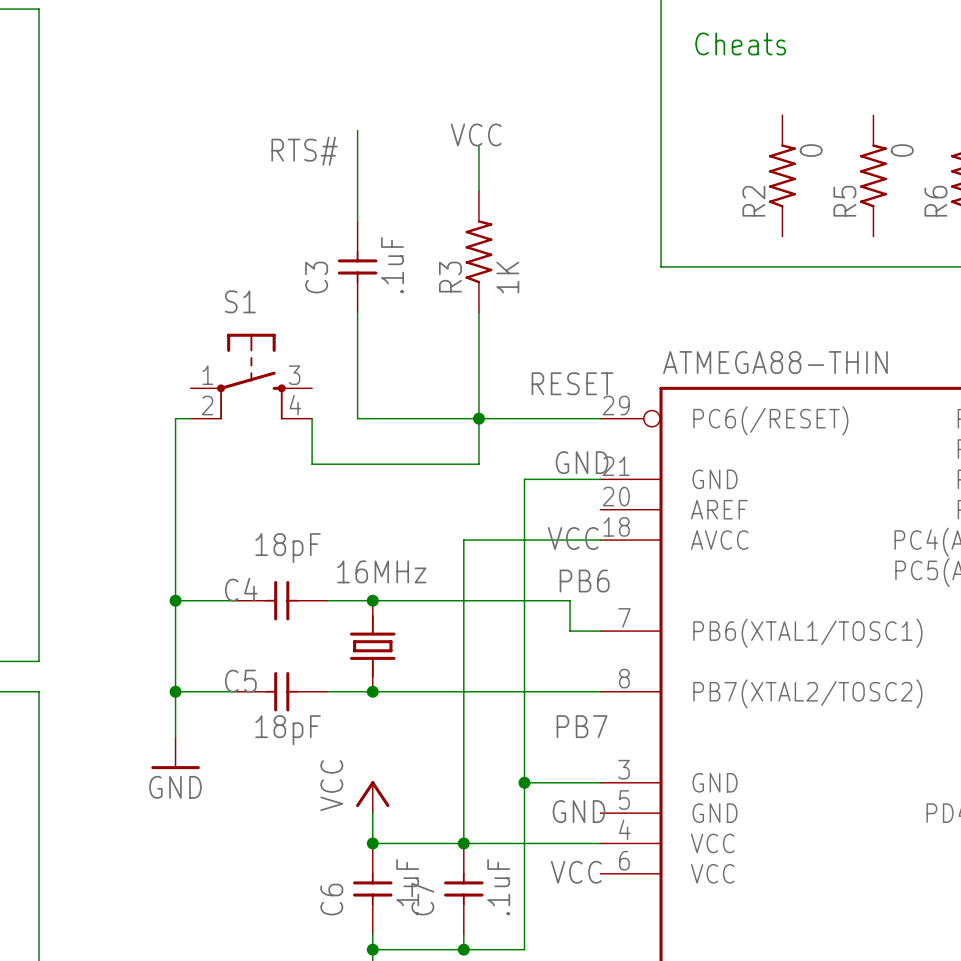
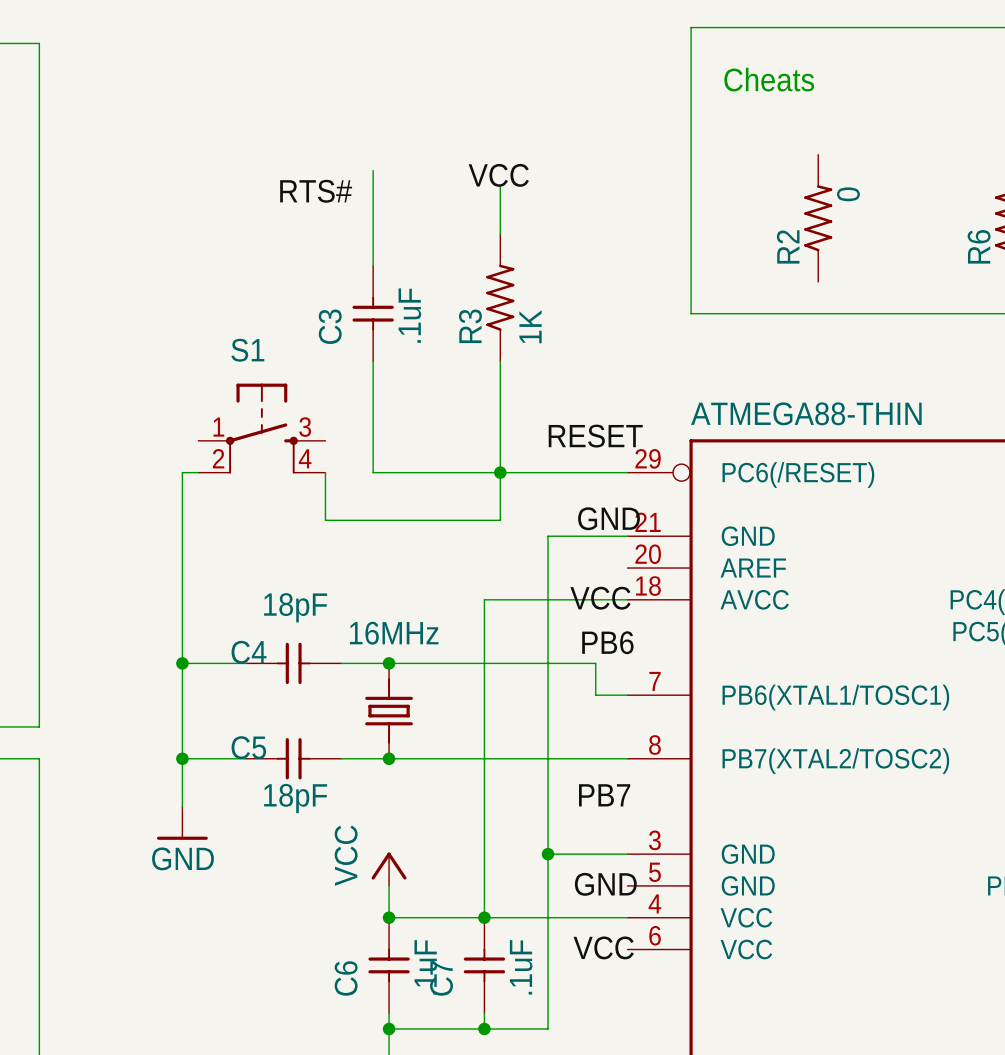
R5: 0 (873, 175) -> none

